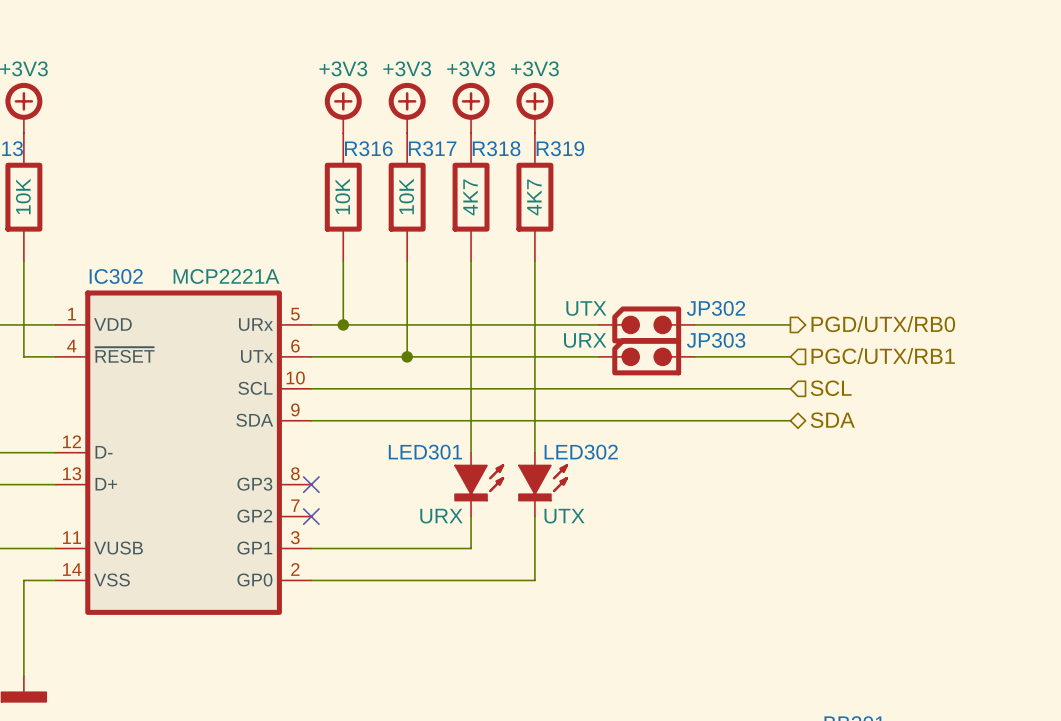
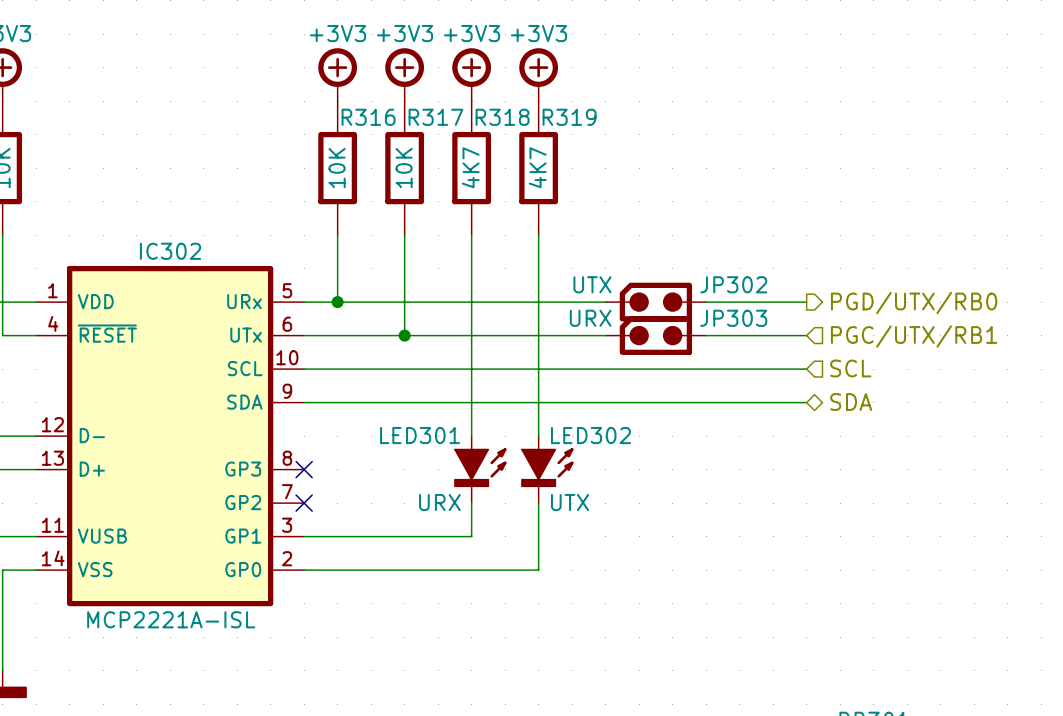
IC302 name position: IC302 (116, 276) -> IC302 (170, 251)
IC302 value: MCP2221A (226, 276) -> none
IC302 text: none -> MCP2221A-ISL (171, 619)

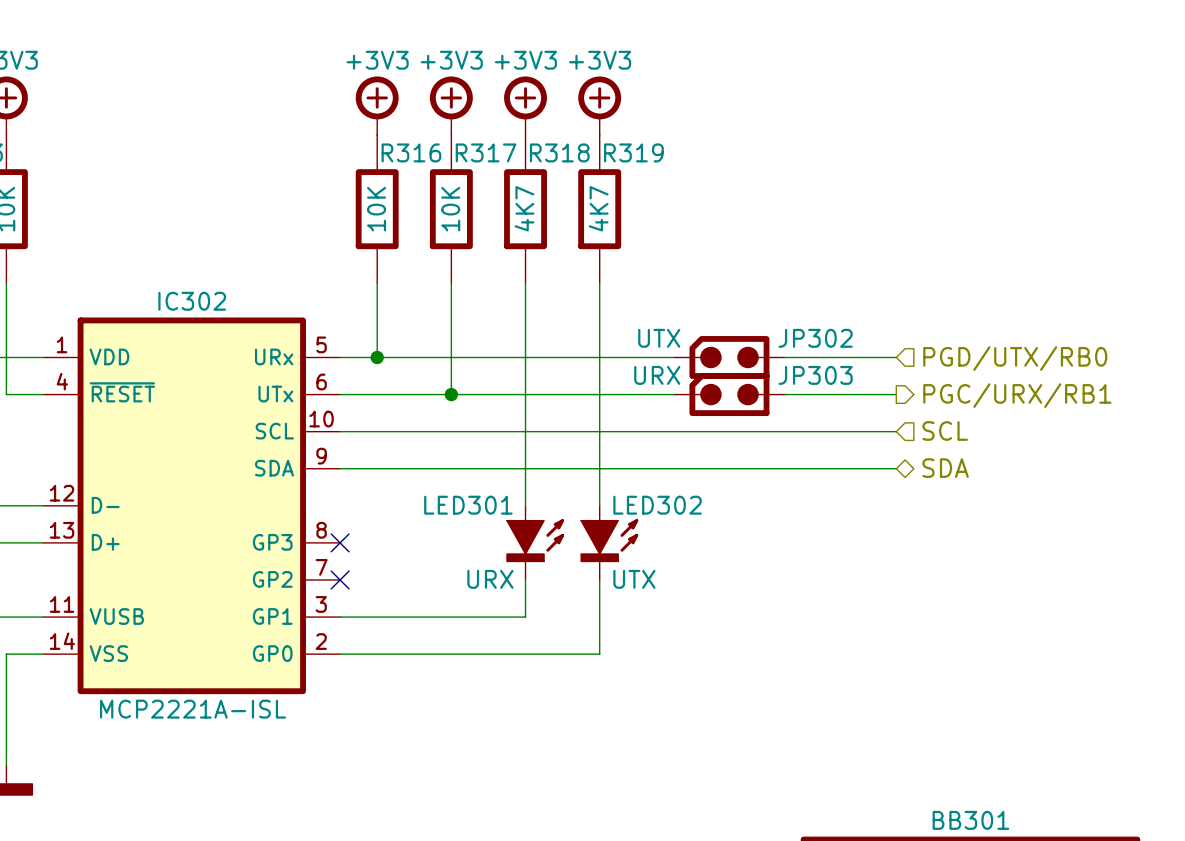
hierarchical label shape: output (914, 303) -> input (1015, 358)
hierarchical label shape: input (914, 336) -> output (1017, 395)
hierarchical label: PGC/UTX/RB1 (914, 336) -> PGC/URX/RB1 (1017, 395)

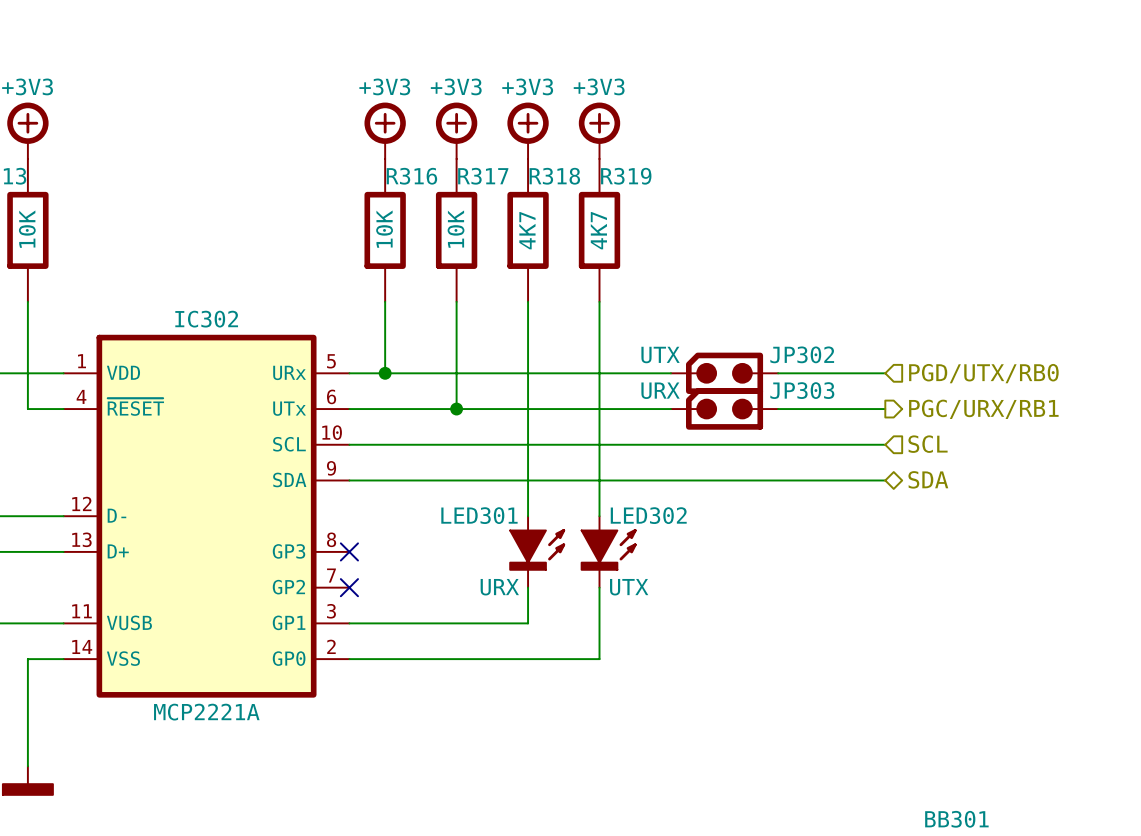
IC302 text: MCP2221A-ISL (193, 709) -> MCP2221A (206, 712)

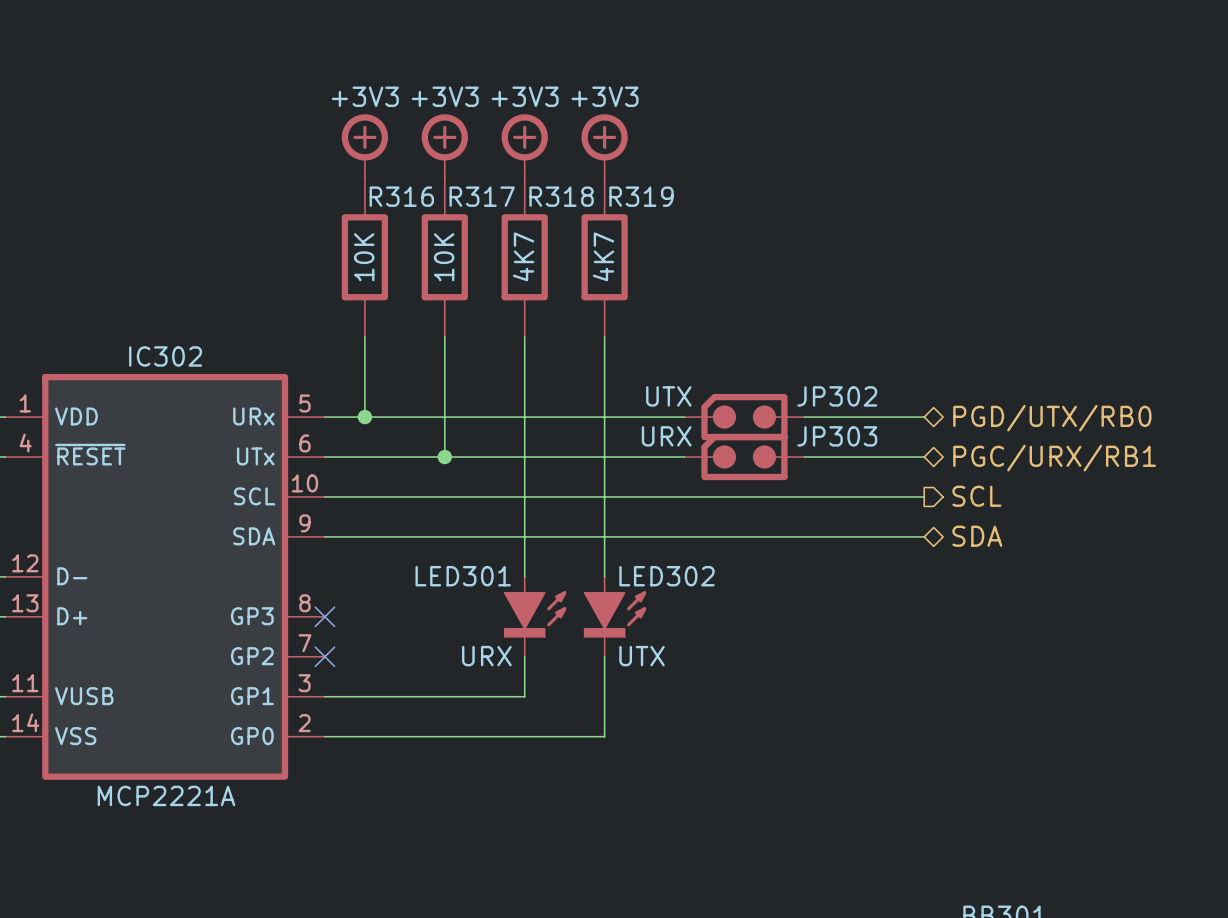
hierarchical label shape: input (983, 373) -> bidirectional (1052, 418)
hierarchical label shape: output (983, 409) -> bidirectional (1054, 458)
hierarchical label shape: input (928, 444) -> output (976, 496)

